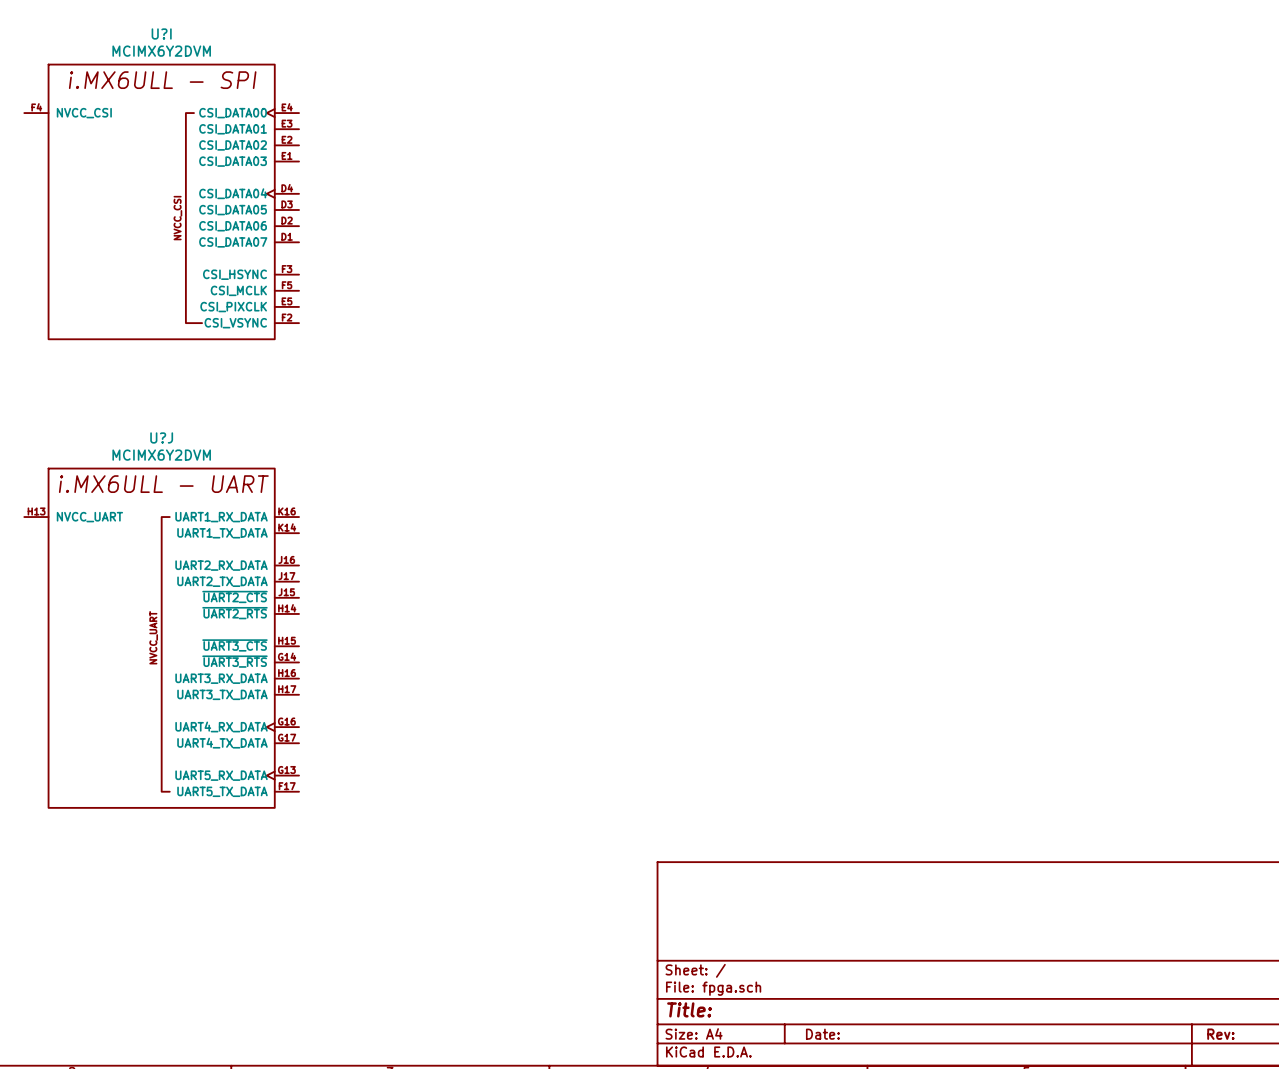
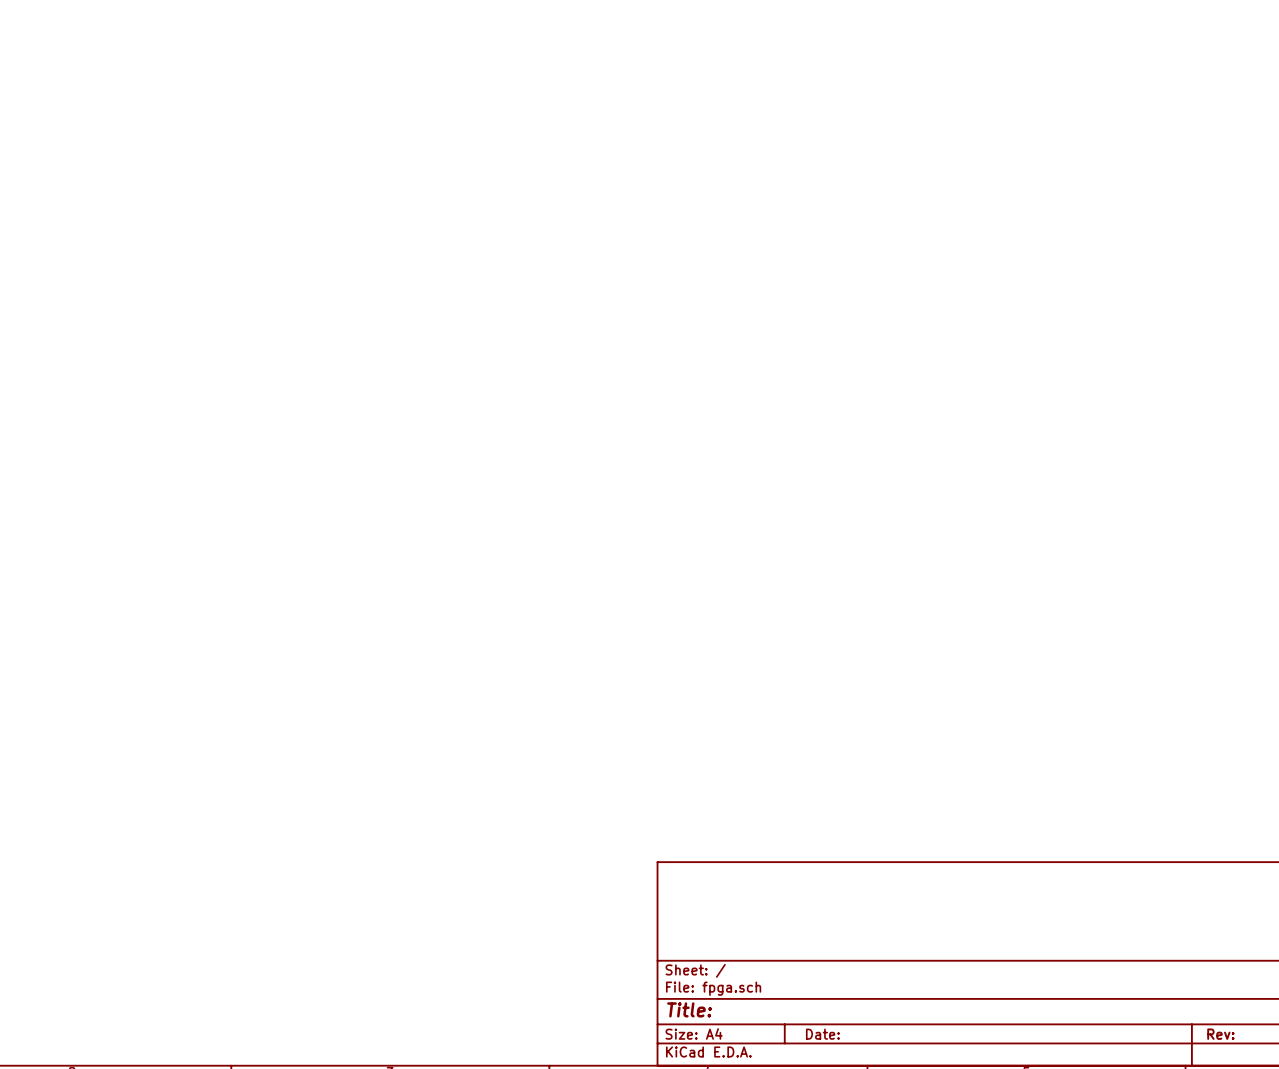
U?I: MCIMX6Y2DVM (161, 201) -> none
U?J: MCIMX6Y2DVM (161, 638) -> none

